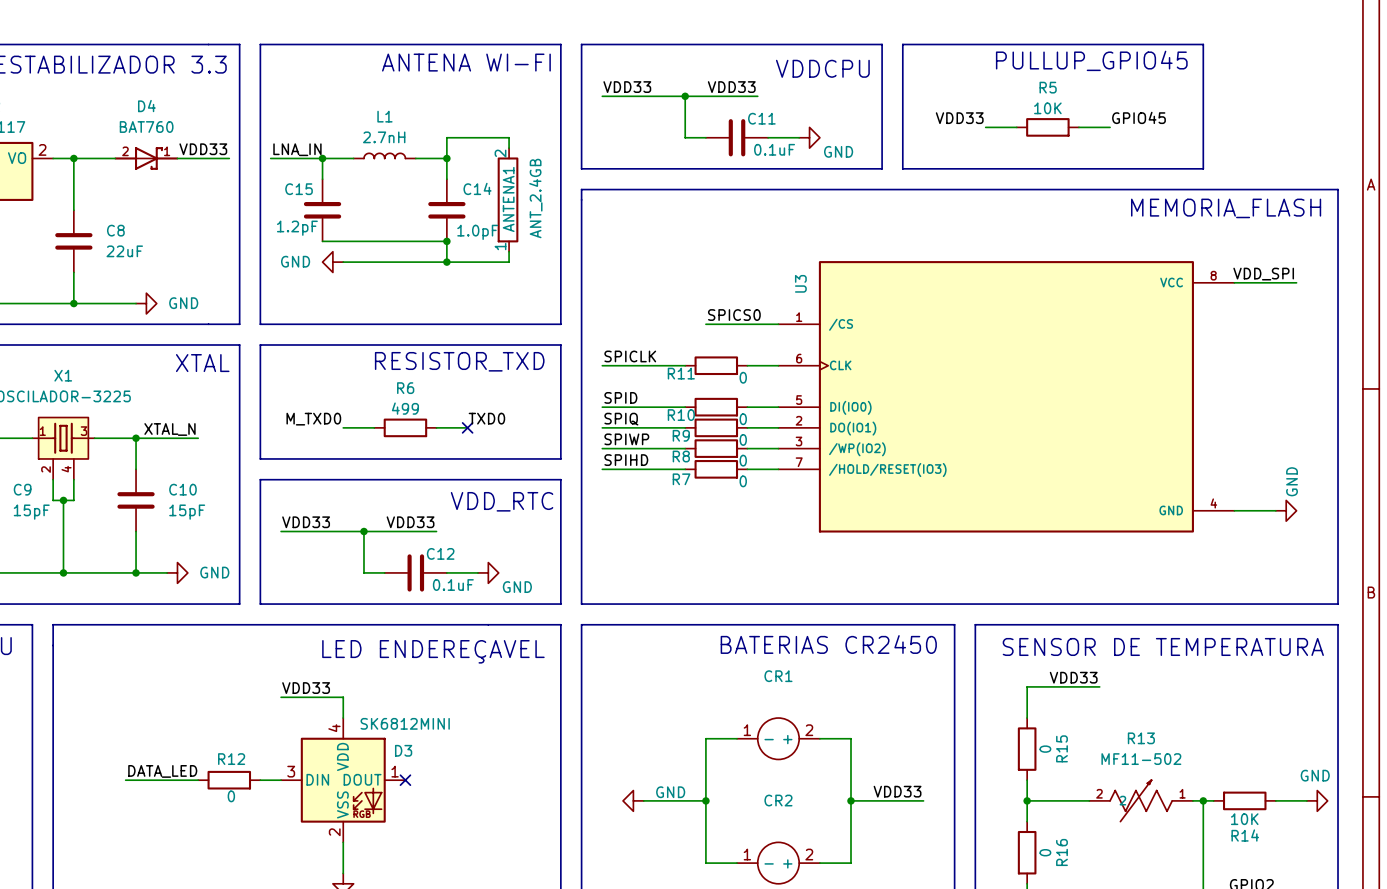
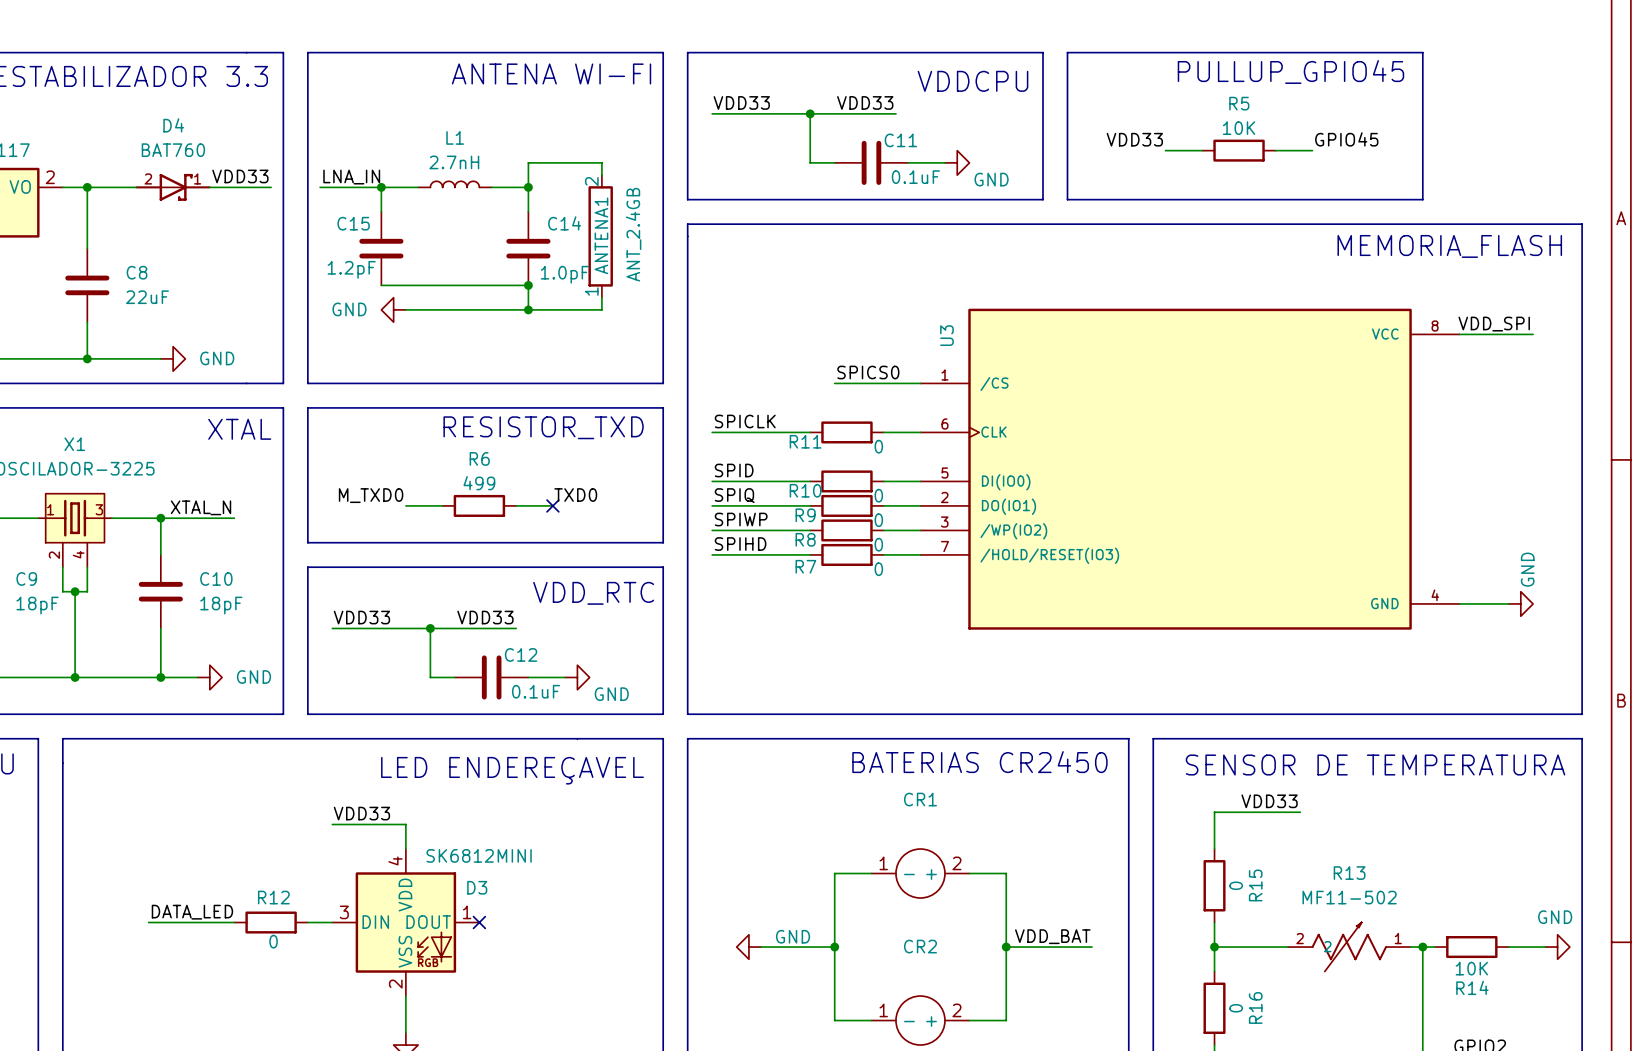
C9 value: 15pF (31, 512) -> 18pF (37, 605)
C10 value: 15pF (187, 512) -> 18pF (221, 605)
label: VDD33 (897, 791) -> VDD_BAT (1052, 936)

